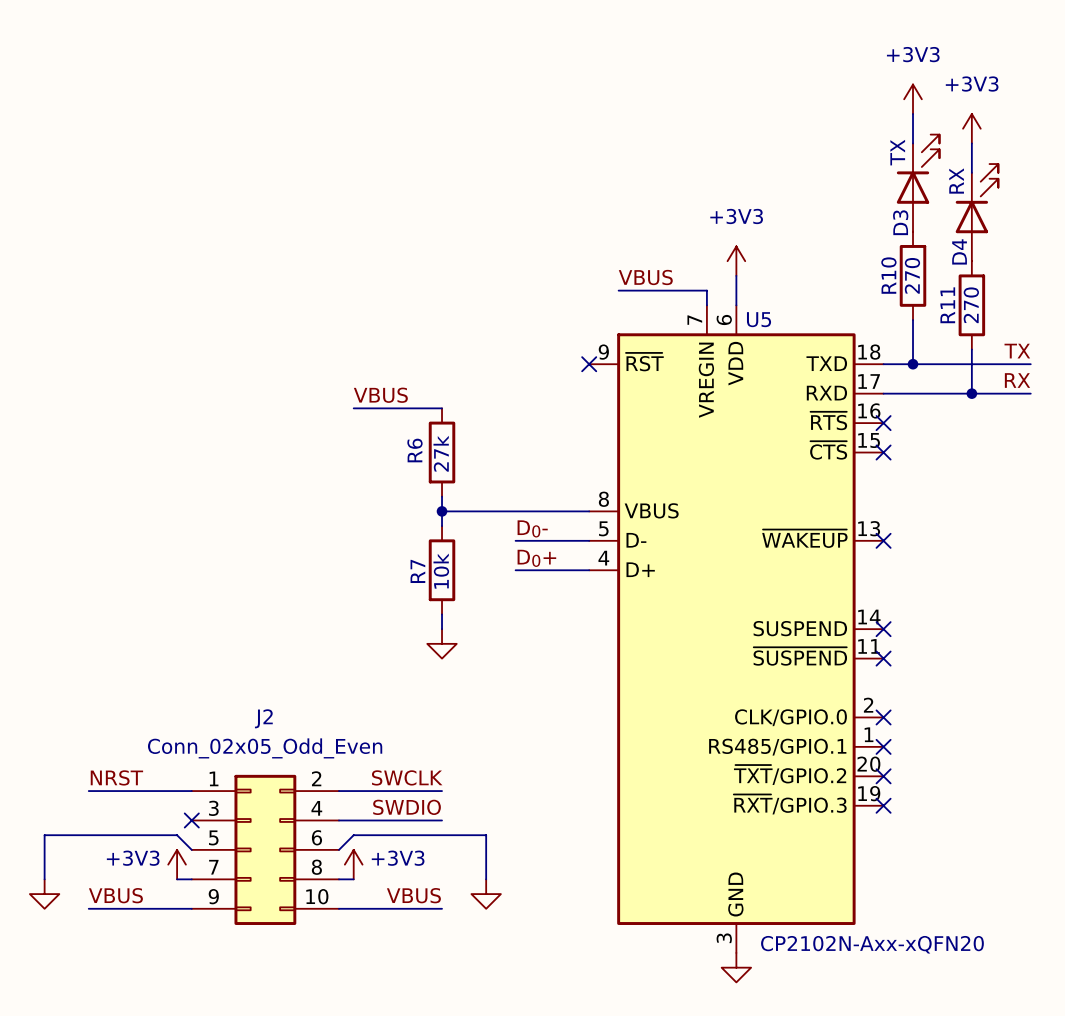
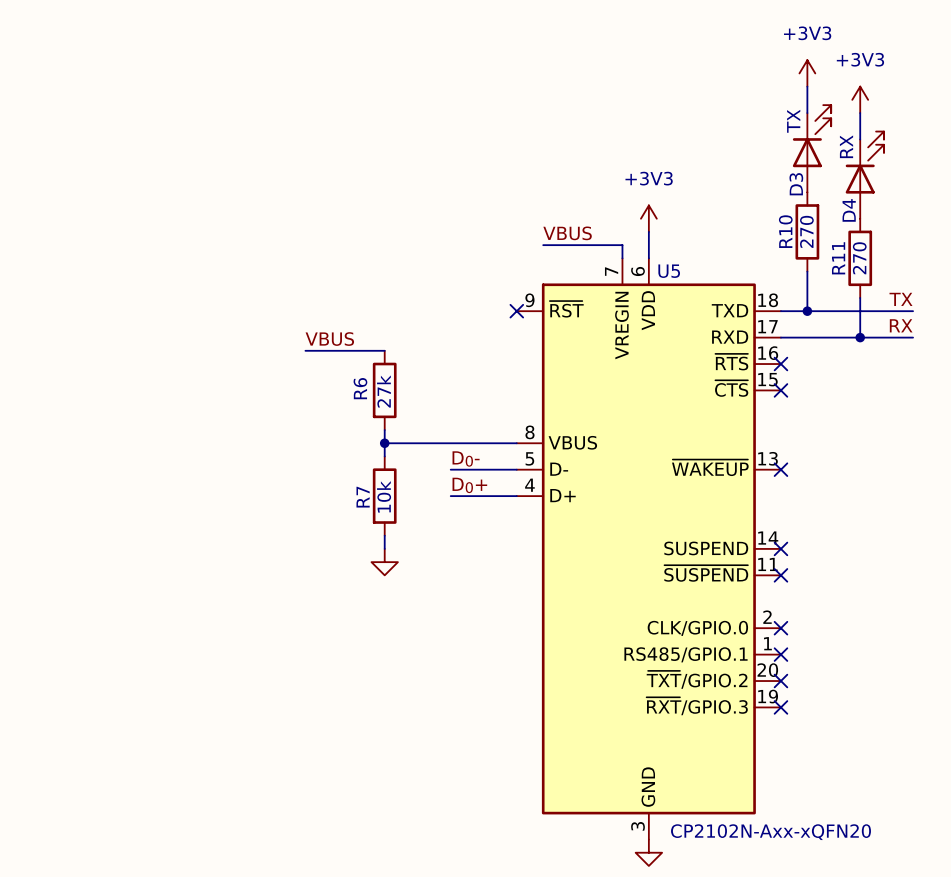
label: NRST (116, 777) -> none
label: SWCLK (407, 777) -> none
wire: (88, 791) (191, 791) -> none
wire: (338, 791) (442, 791) -> none
label: SWDIO (407, 807) -> none
no-connect mark: (191, 820) -> none
wire: (338, 820) (442, 820) -> none
wire: (191, 849) (177, 835) (44, 835) (44, 879) -> none
J2: Conn_02x05_Odd_Even (265, 849) -> none
wire: (338, 849) (353, 835) (486, 835) (486, 879) -> none
power symbol: +3V3 (177, 864) -> none
power symbol: +3V3 (353, 864) -> none
wire: (177, 879) (191, 879) -> none
wire: (338, 879) (353, 879) -> none
power symbol: (44, 894) -> none
power symbol: (486, 894) -> none
label: VBUS (115, 895) -> none
label: VBUS (413, 895) -> none
wire: (88, 908) (191, 908) -> none
wire: (338, 908) (442, 908) -> none

